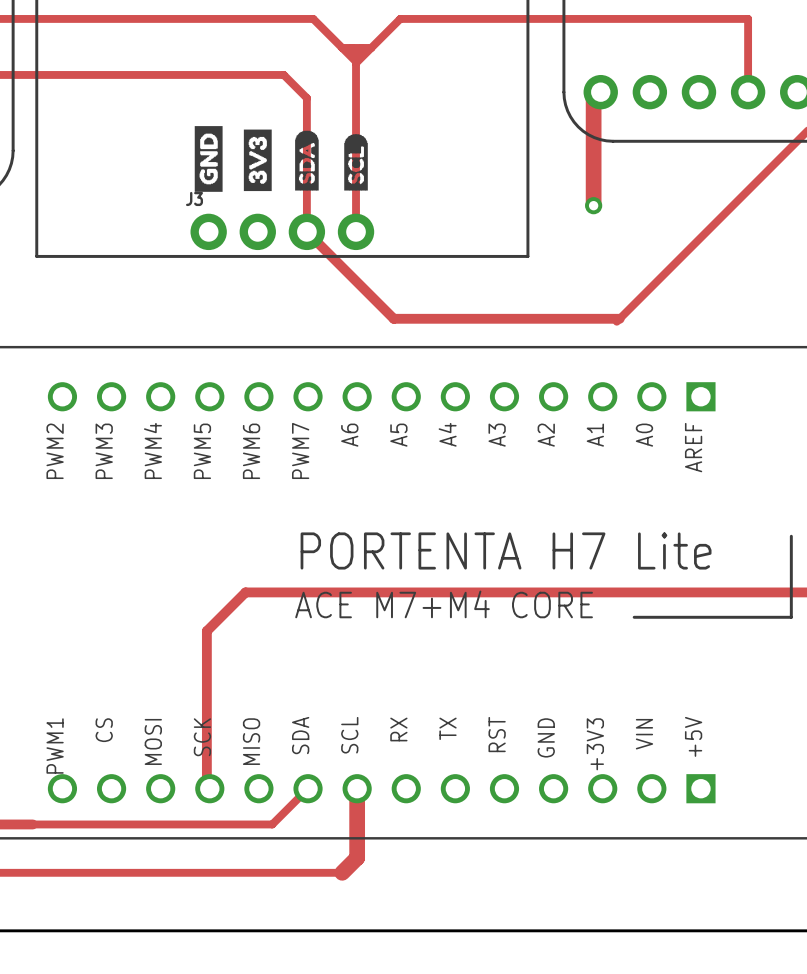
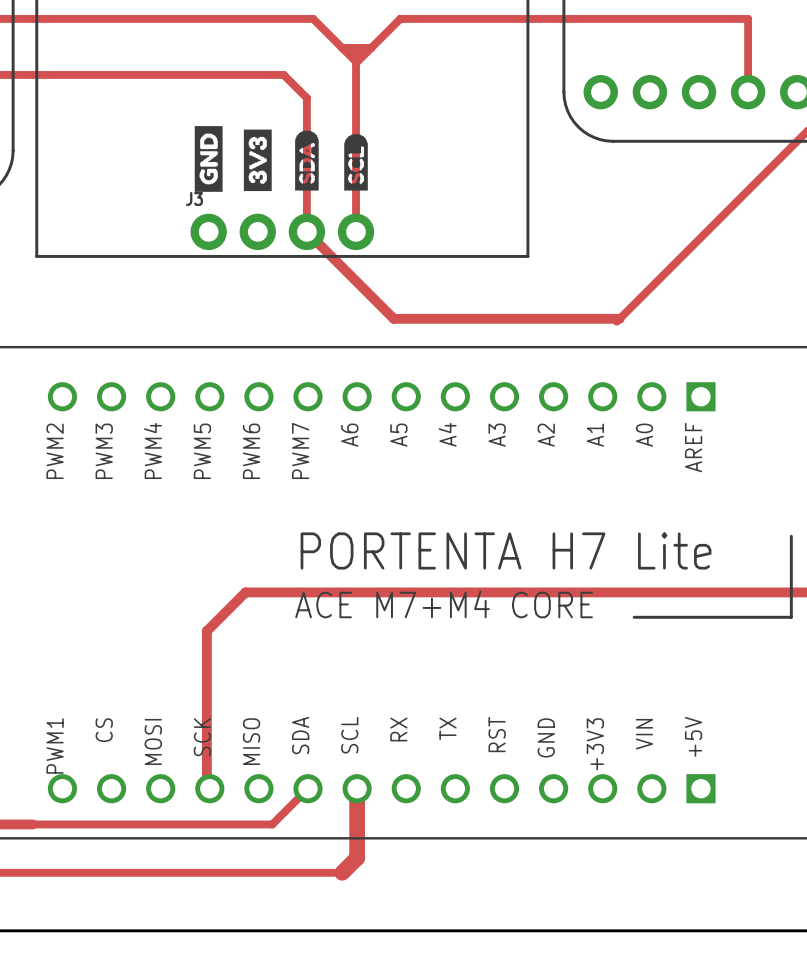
track: (600, 92) (593, 99) (593, 205) -> none
via: (593, 205) -> none

